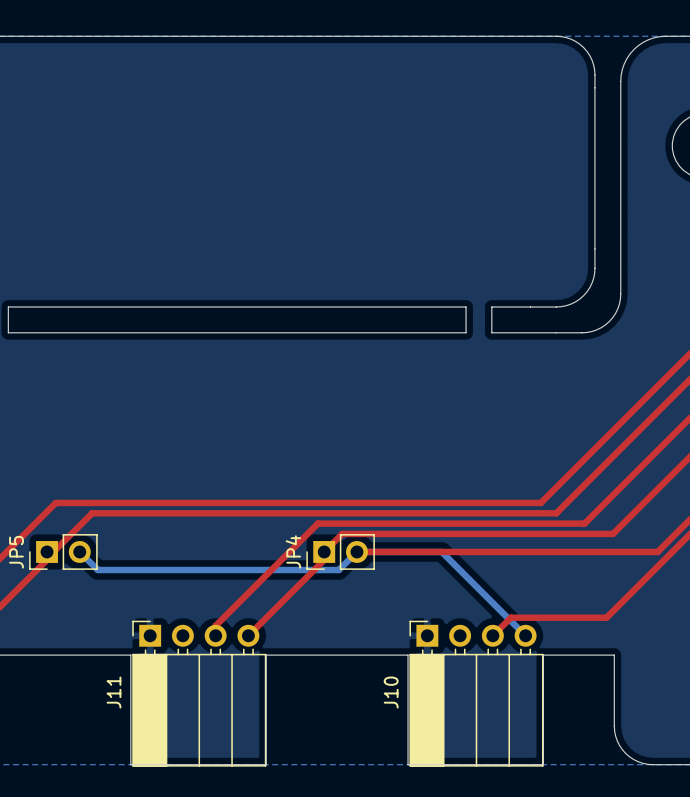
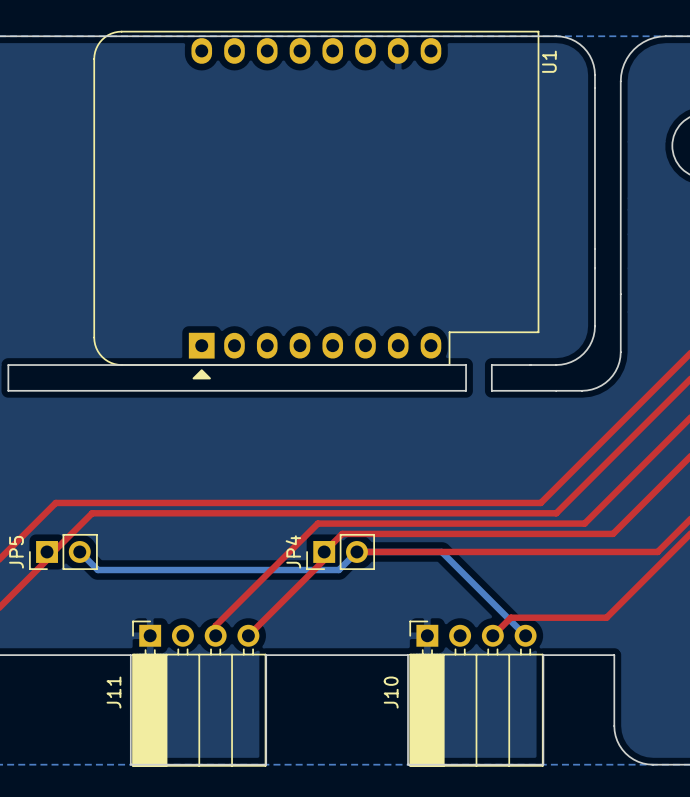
U1: none -> (316, 205)
board edge: (594, 268) (592, 283) (586, 291) (571, 304) (556, 307) (491, 307) (491, 332) (592, 331) (601, 327) (612, 317) (617, 308) (620, 294) -> (594, 268) (594, 331) (586, 349) (575, 359) (561, 364) (491, 365) (491, 390) (587, 390) (605, 382) (615, 371) (620, 357) (620, 294)
board edge: (8, 307) (466, 307) (466, 332) (8, 332) (8, 307) -> (8, 365) (466, 365) (466, 390) (8, 390) (8, 365)

